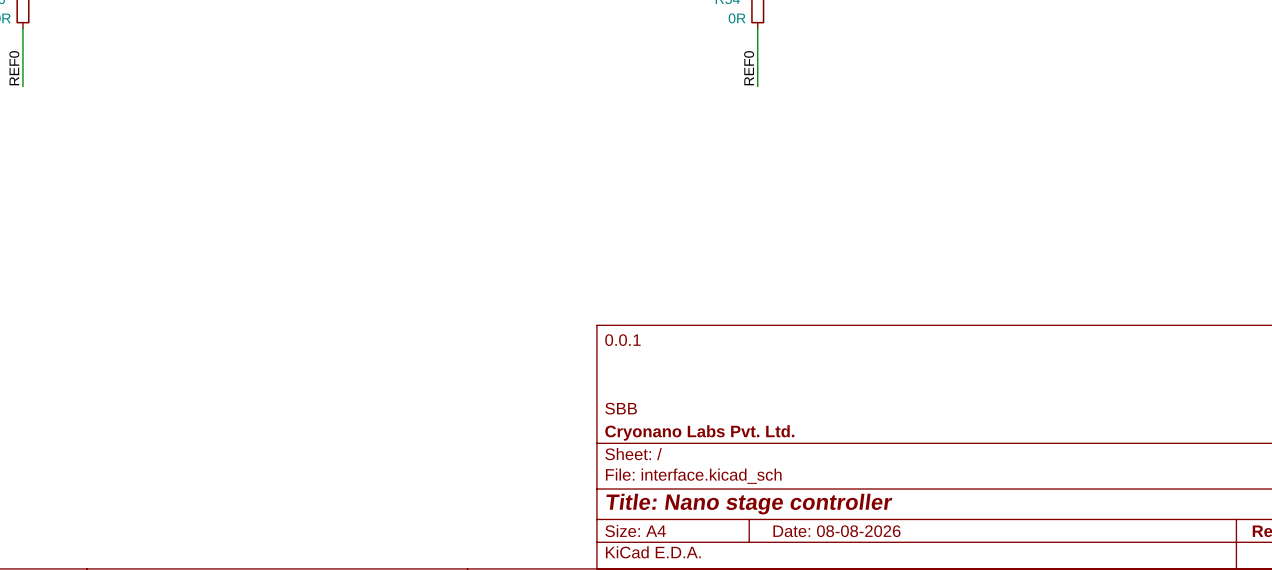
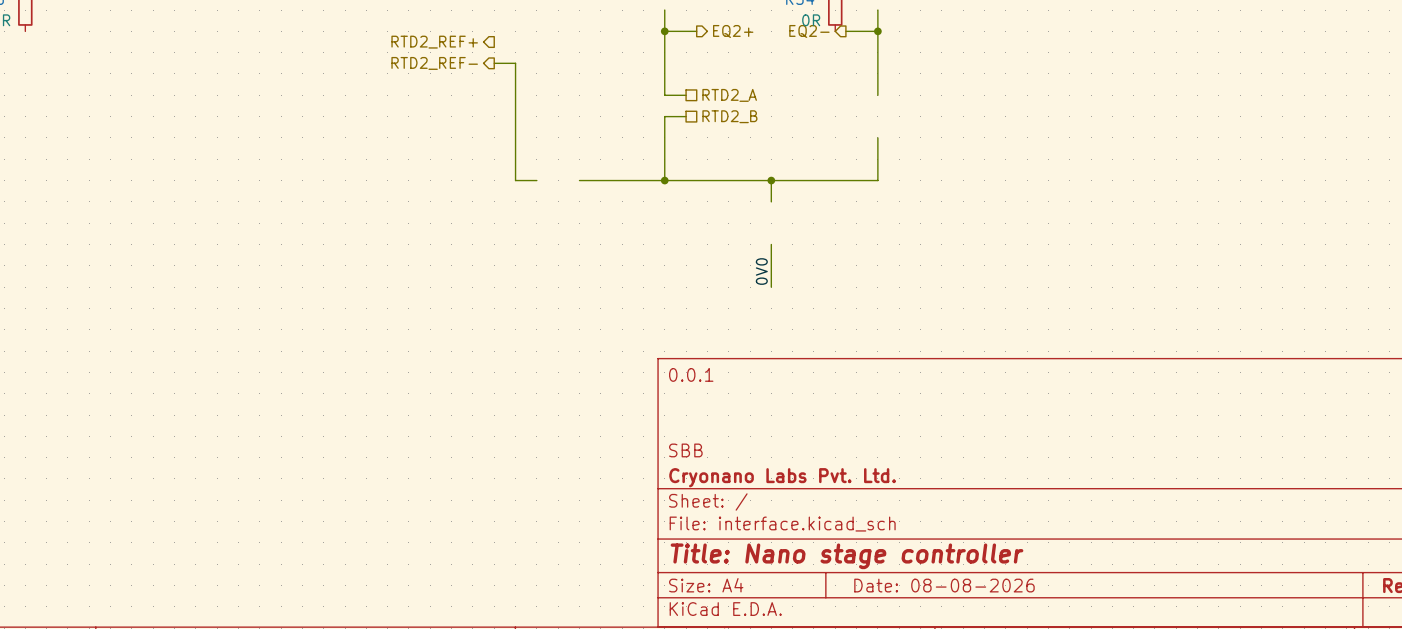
wire: none -> (664, 10) (664, 95) (686, 95)
wire: none -> (877, 10) (877, 95)
wire: (22, 28) (22, 86) -> none
wire: none -> (664, 31) (696, 31)
junction: none -> (664, 31)
wire: (757, 28) (757, 86) -> none
wire: none -> (845, 31) (877, 31)
junction: none -> (877, 31)
hierarchical label: none -> EQ2+ (733, 31)
hierarchical label: none -> EQ2- (809, 31)
hierarchical label: none -> RTD2_REF+ (434, 42)
wire: none -> (494, 63) (515, 63) (515, 180) (536, 180)
hierarchical label: none -> RTD2_REF- (434, 63)
label: REF0 (14, 68) -> none
label: REF0 (749, 68) -> none
hierarchical label: none -> RTD2_A (729, 95)
wire: none -> (686, 116) (664, 116) (664, 180)
hierarchical label: none -> RTD2_B (729, 116)
wire: none -> (877, 137) (877, 180) (579, 180)
junction: none -> (664, 180)
wire: none -> (771, 180) (771, 201)
junction: none -> (771, 180)
wire: none -> (771, 244) (771, 287)
label: none -> 0V0 (761, 271)

